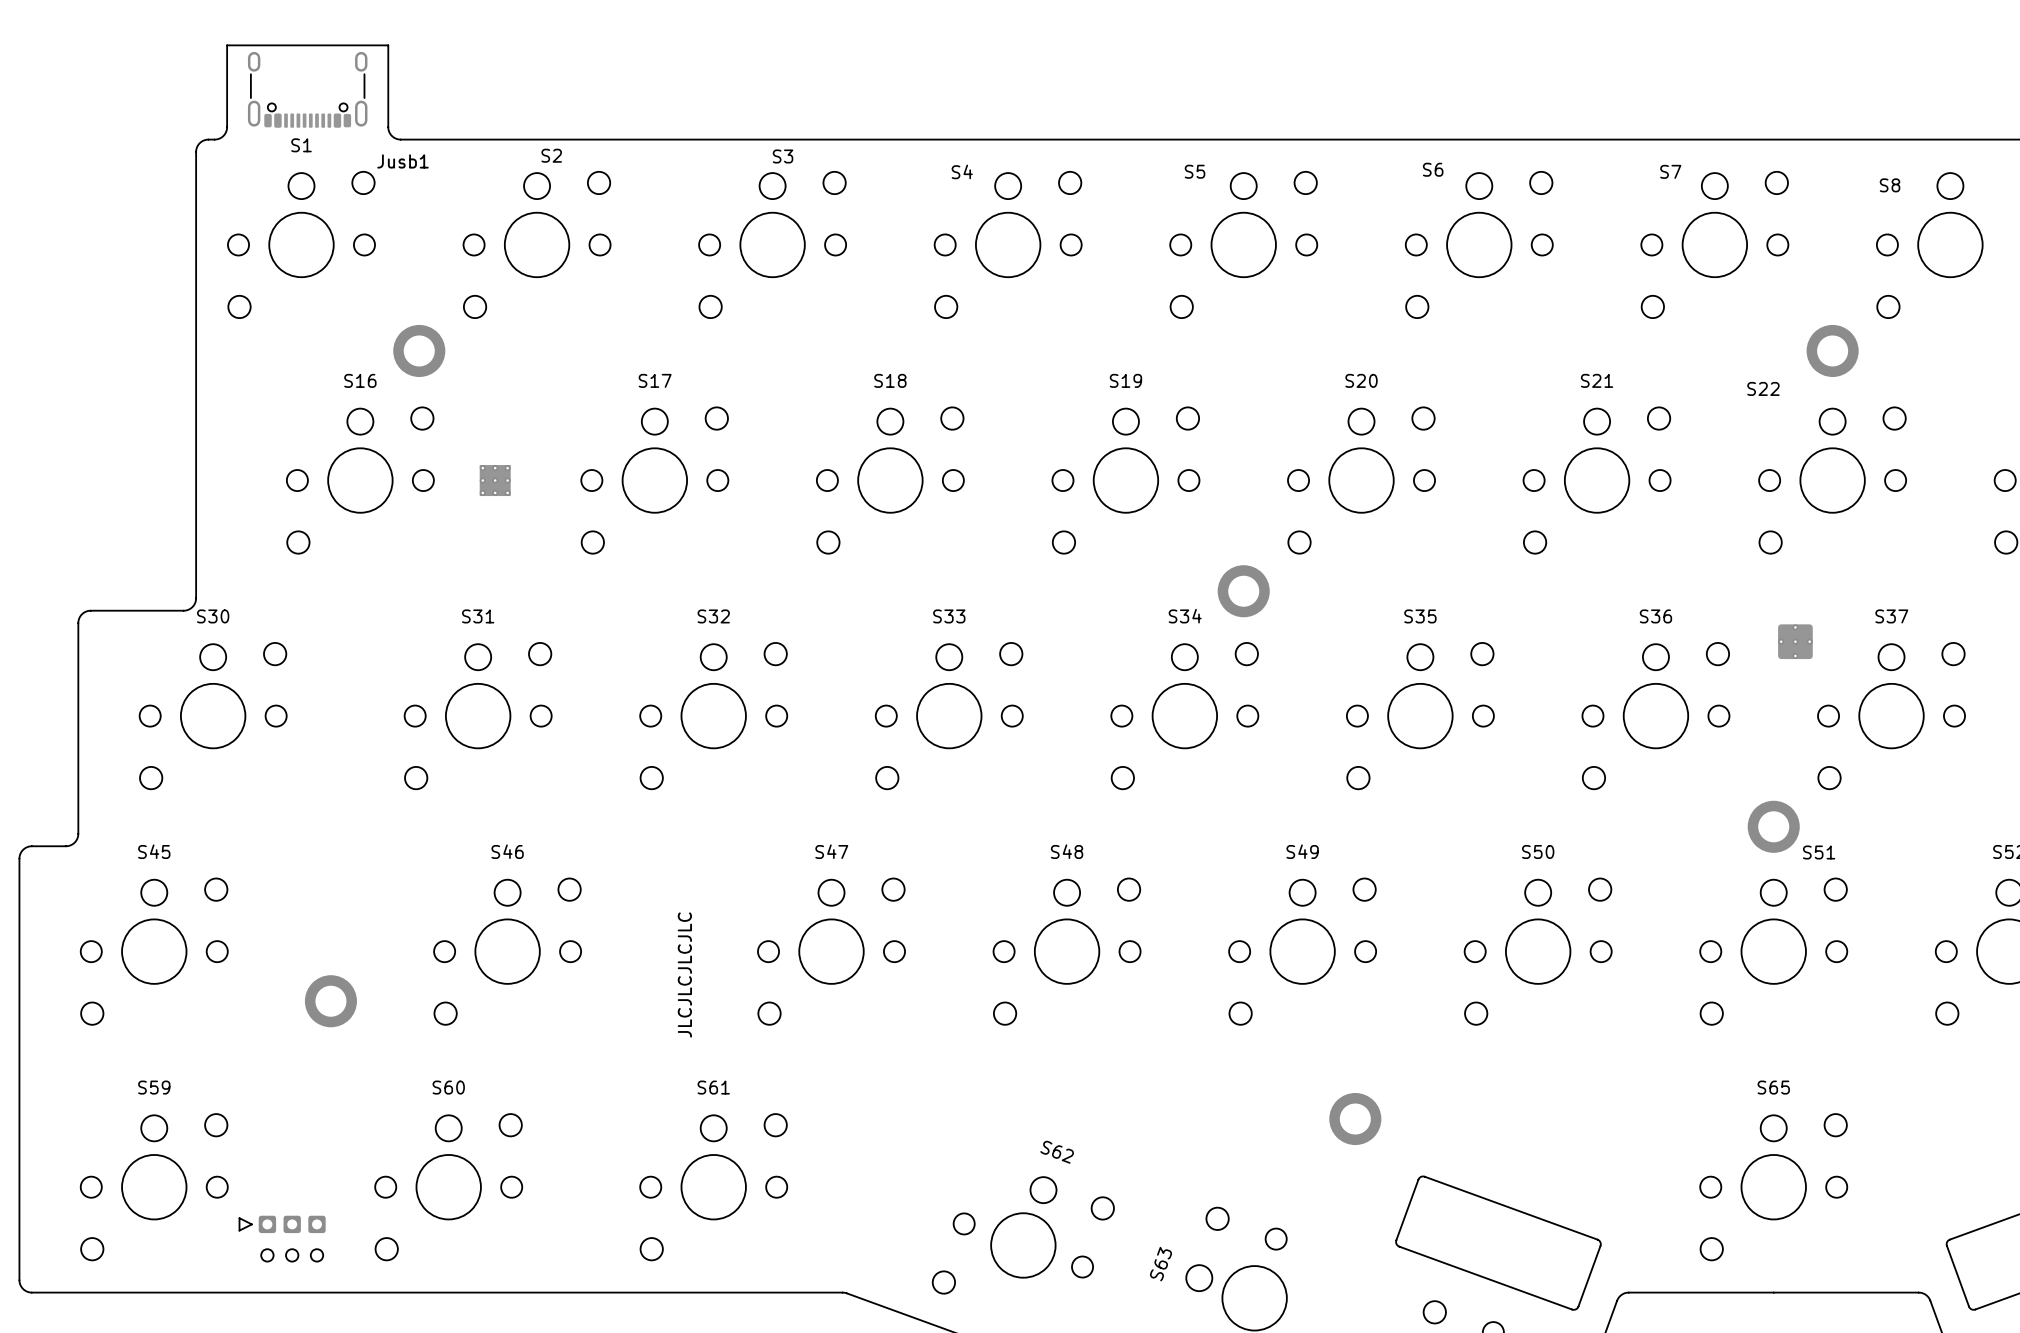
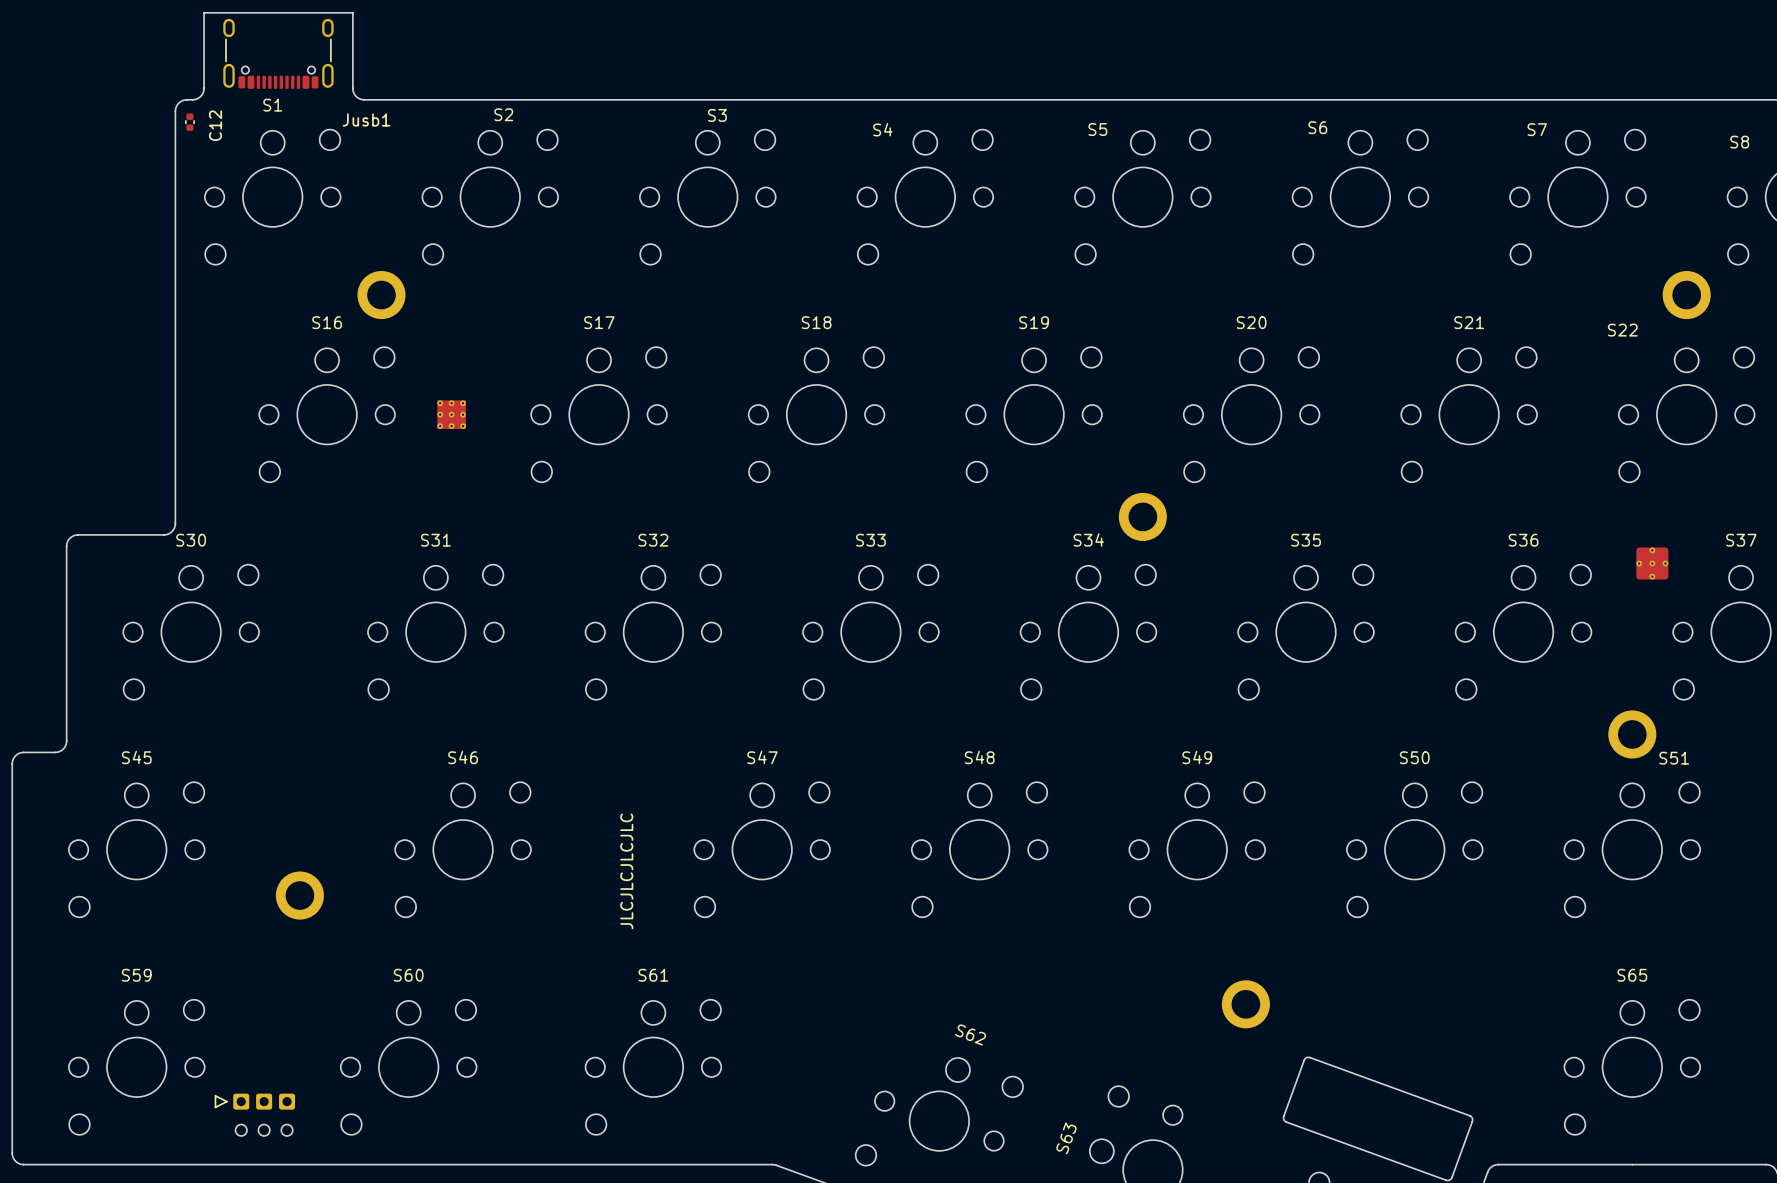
C12: none -> (189, 122)

